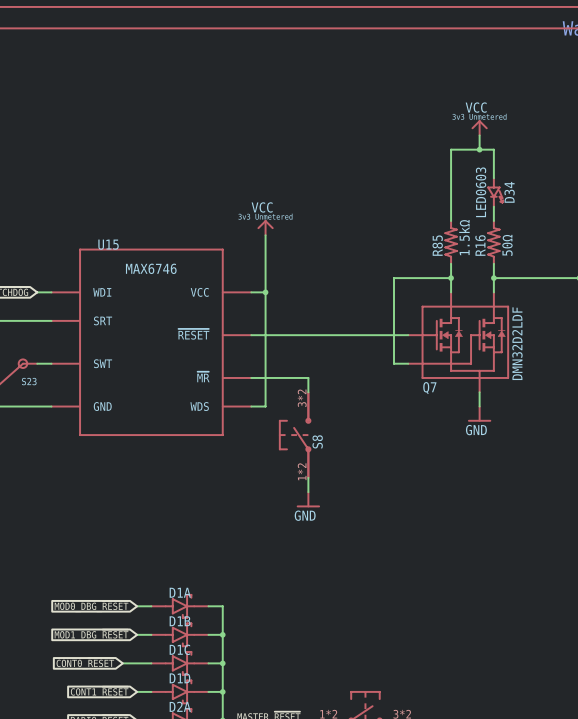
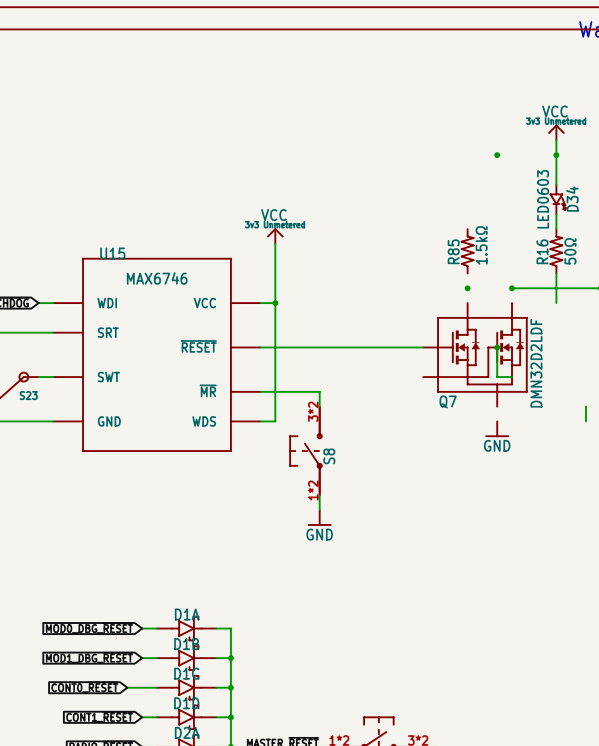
power symbol: (479, 127) -> none
power symbol: none -> (556, 132)
wire: (479, 135) (479, 149) -> none
wire: none -> (556, 140) (556, 184)
junction: none -> (556, 155)
wire: (493, 178) (493, 149) (451, 149) (451, 221) -> none
D34 position: (495, 192) -> (558, 199)
wire: (493, 206) (493, 221) -> (556, 214) (556, 229)
R16 position: (493, 242) -> (556, 251)
wire: (451, 263) (451, 292) -> none
wire: (493, 263) (493, 292) -> (556, 273) (556, 303)
wire: (451, 278) (394, 278) (394, 363) (408, 363) -> none
wire: none -> (497, 347) (497, 377) (512, 377)
junction: none -> (497, 347)
wire: (479, 392) (479, 406) -> (585, 406) (585, 421)

